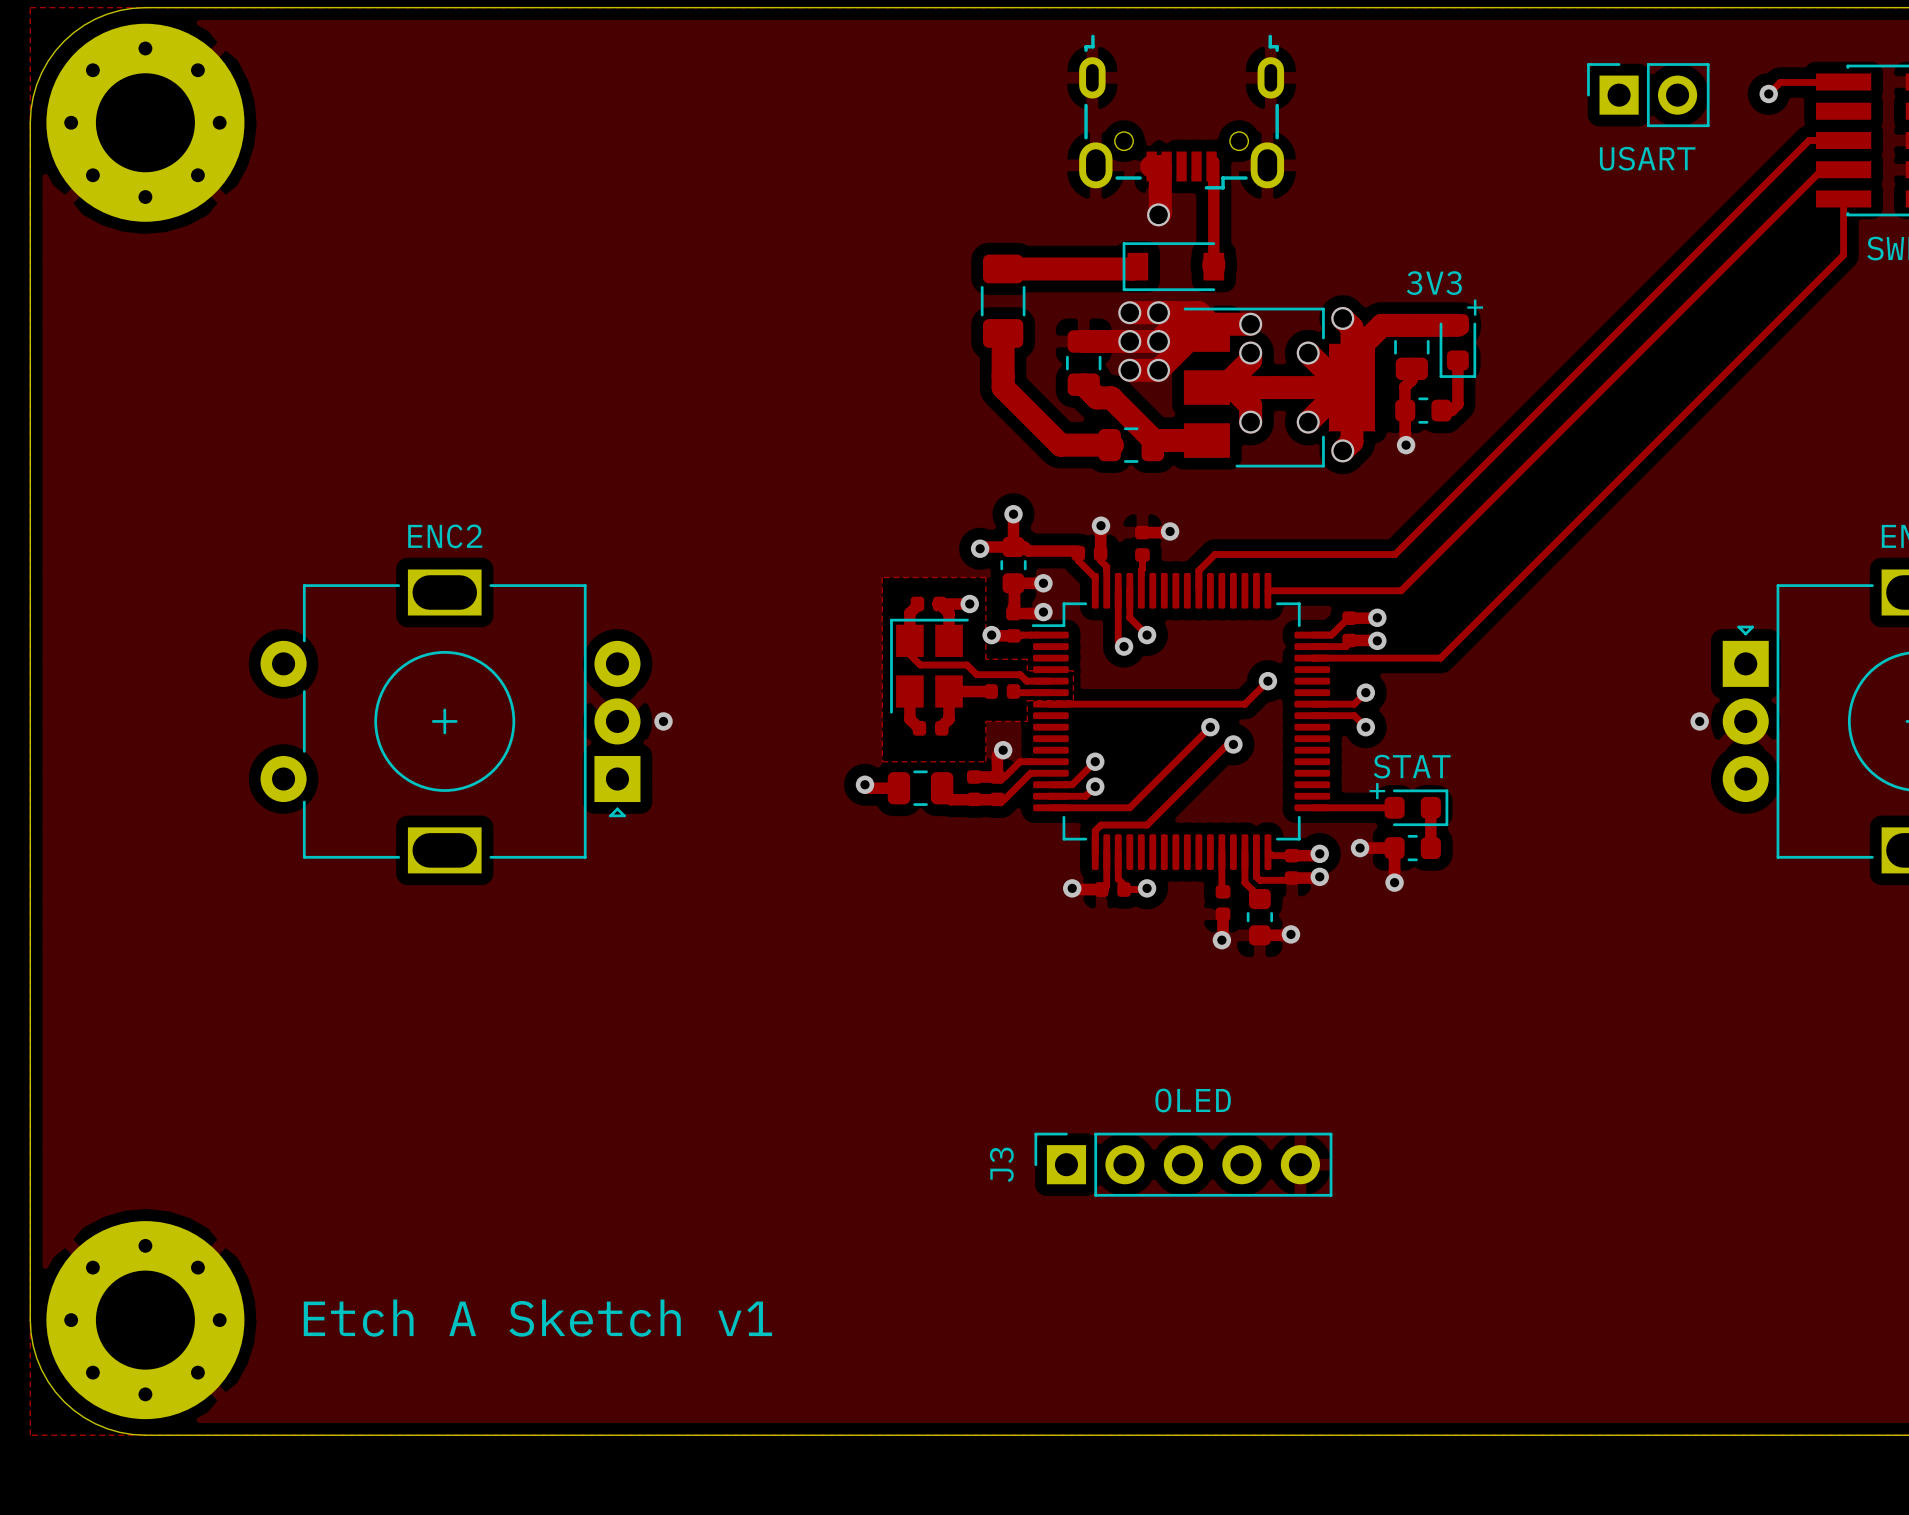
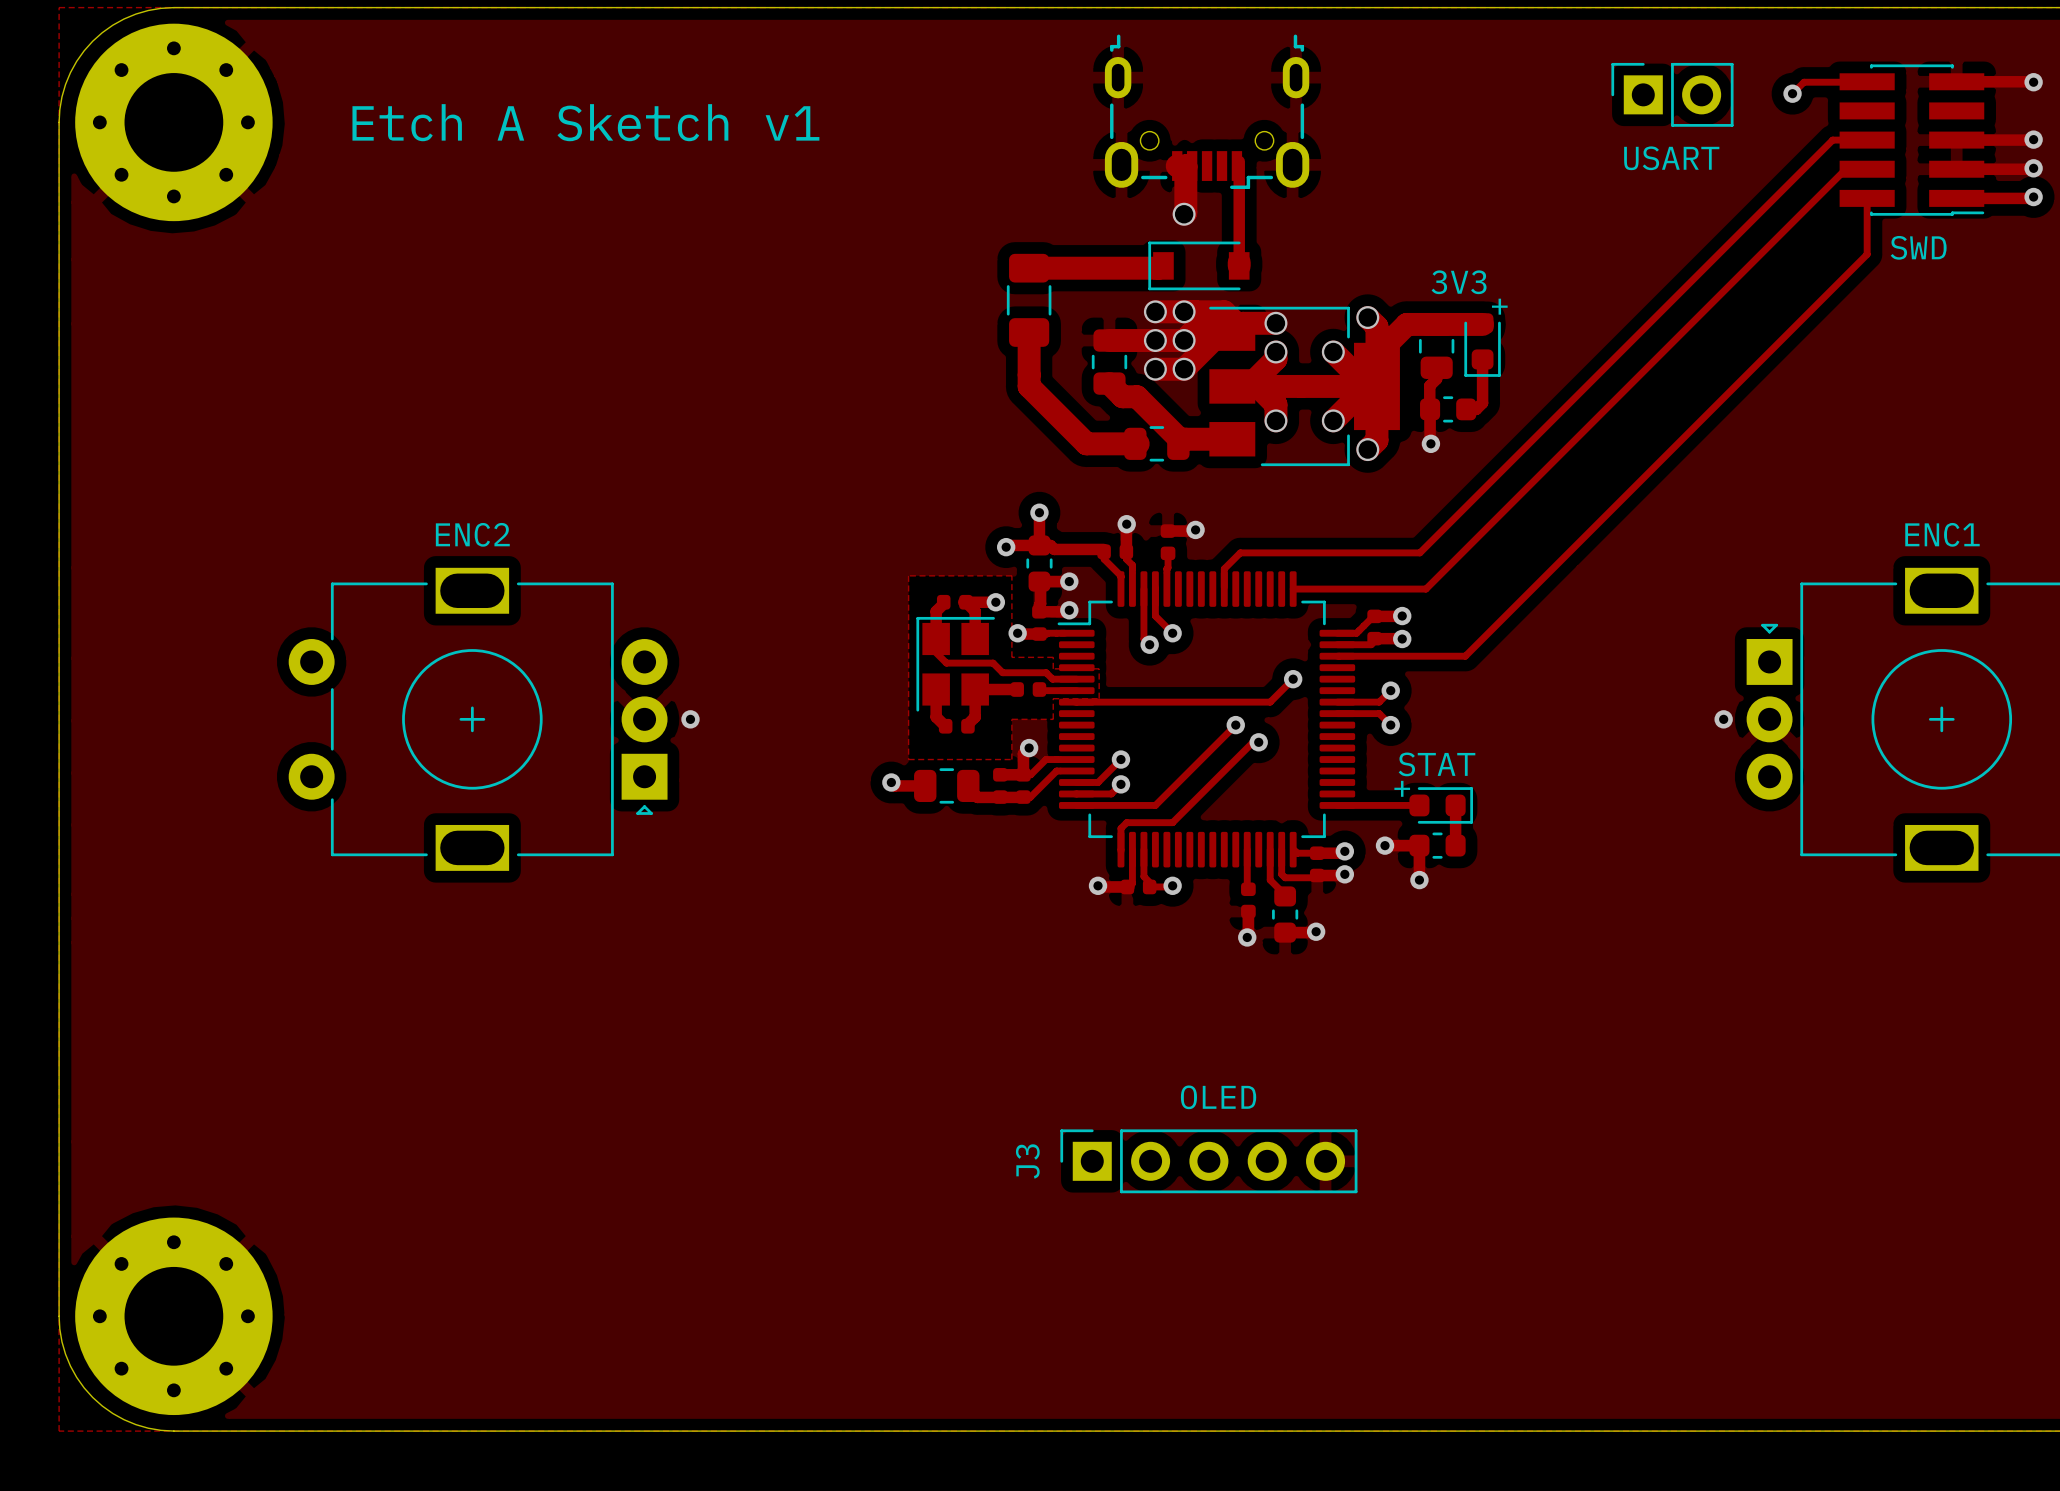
text: none -> Etch A Sketch v1 (585, 122)
text: Etch A Sketch v1 (537, 1318) -> none

